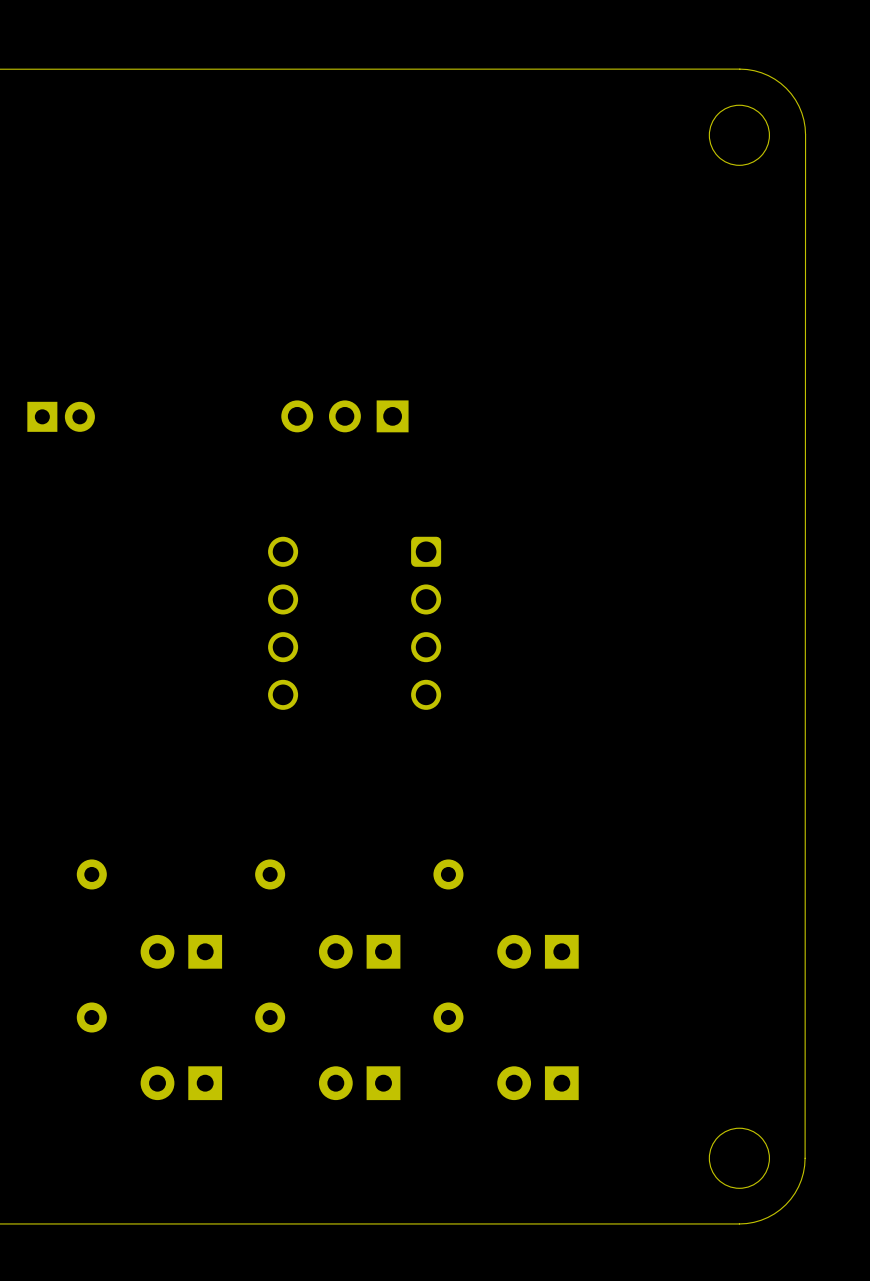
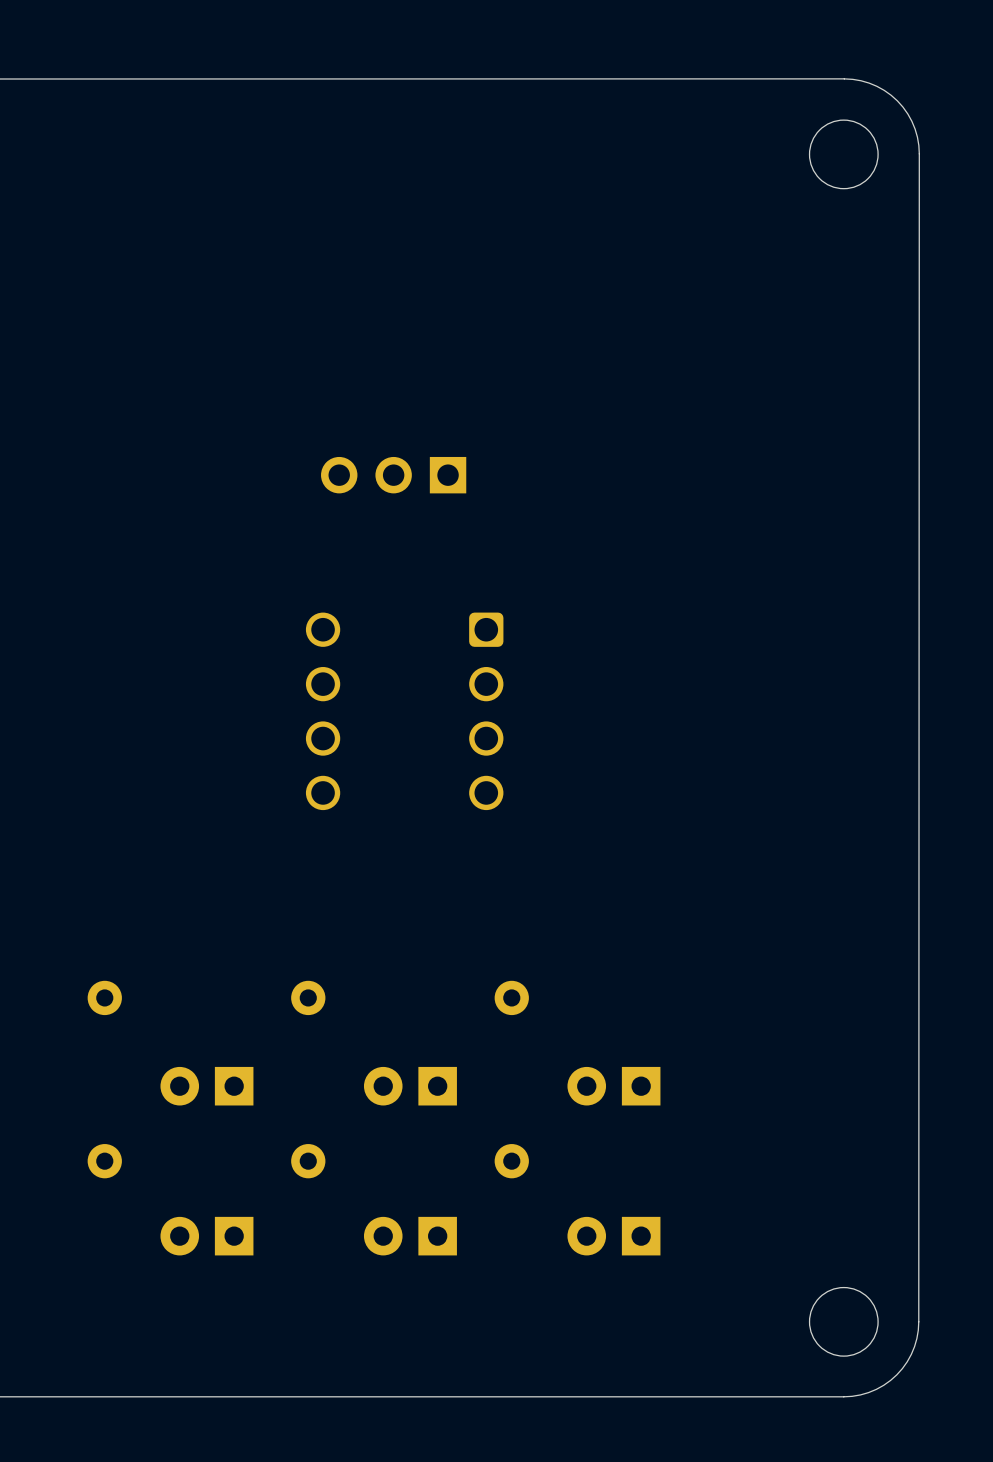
part: (61, 416) -> none

